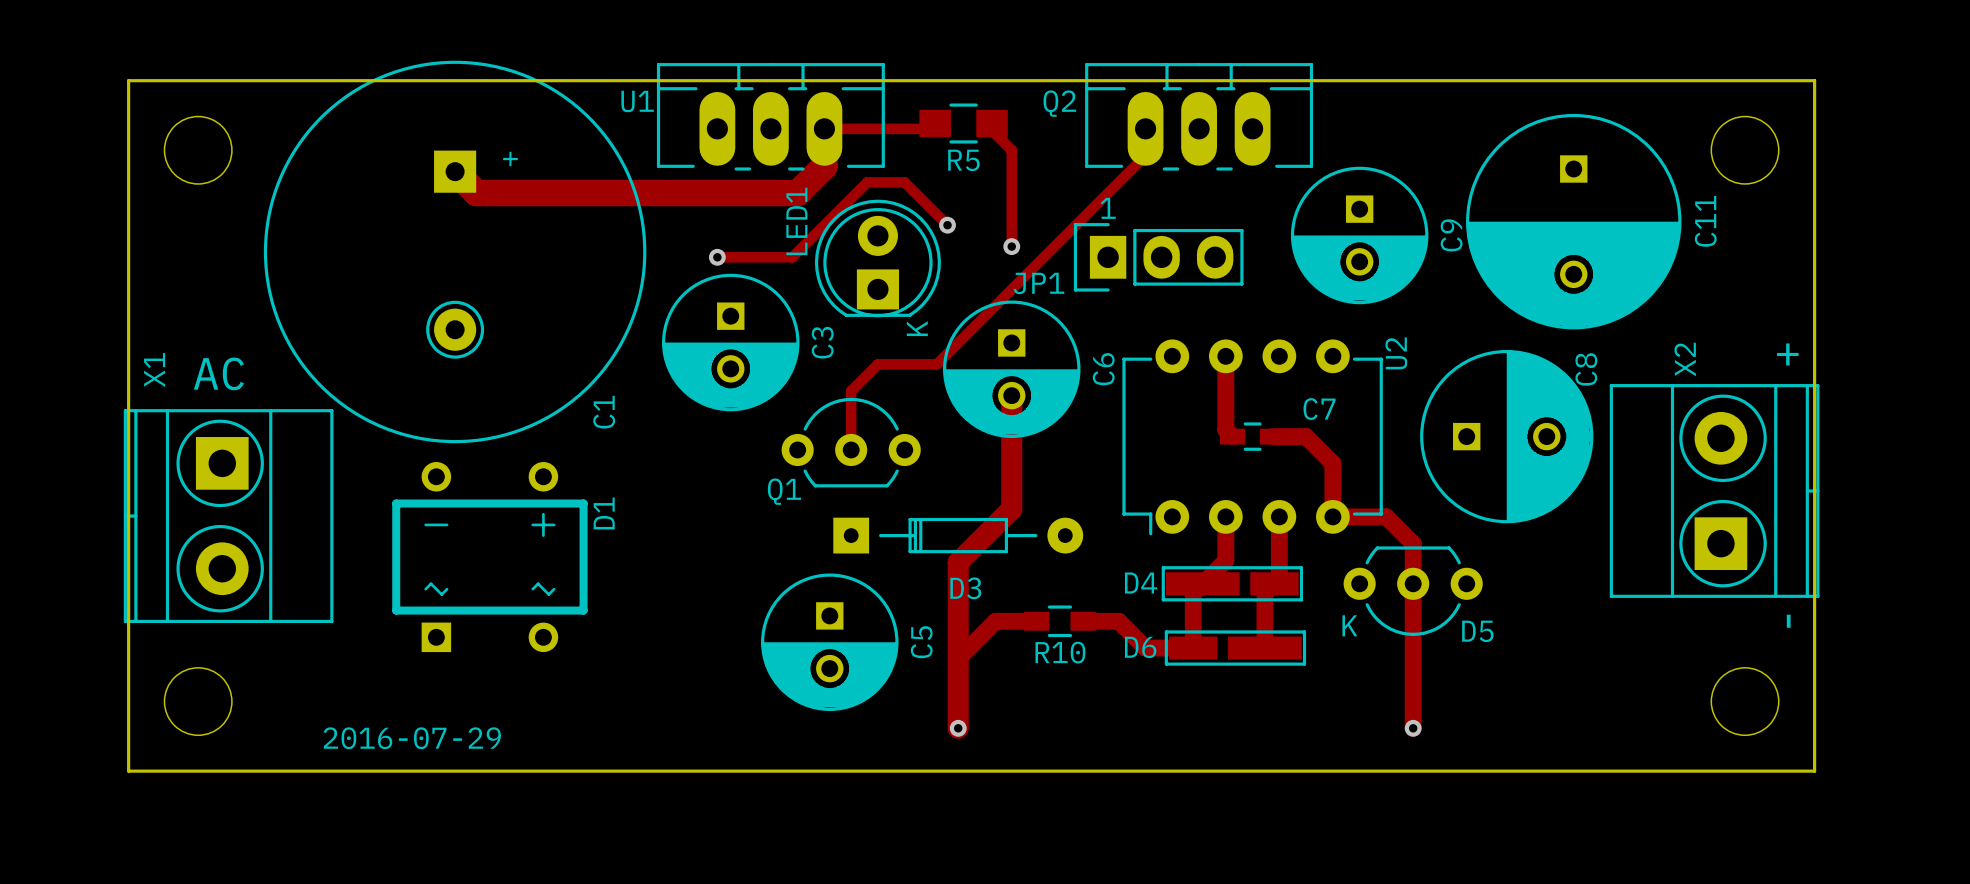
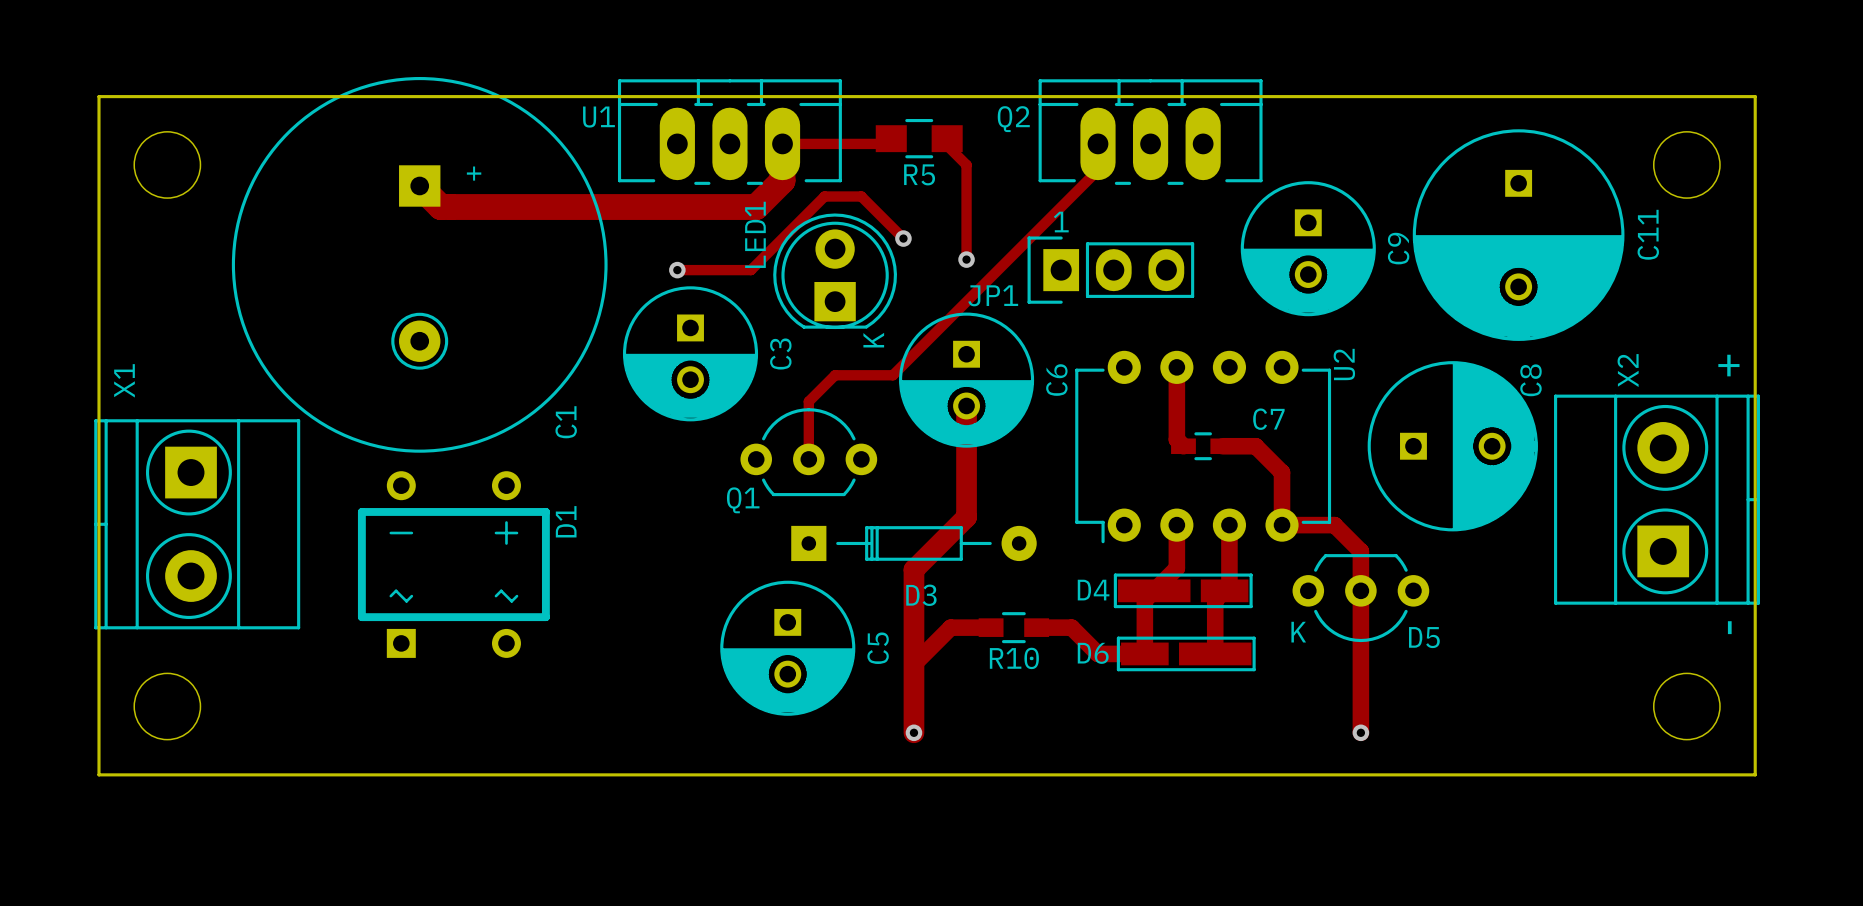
text: AC (218, 373) -> none
text: 2016-07-29 (412, 738) -> none

